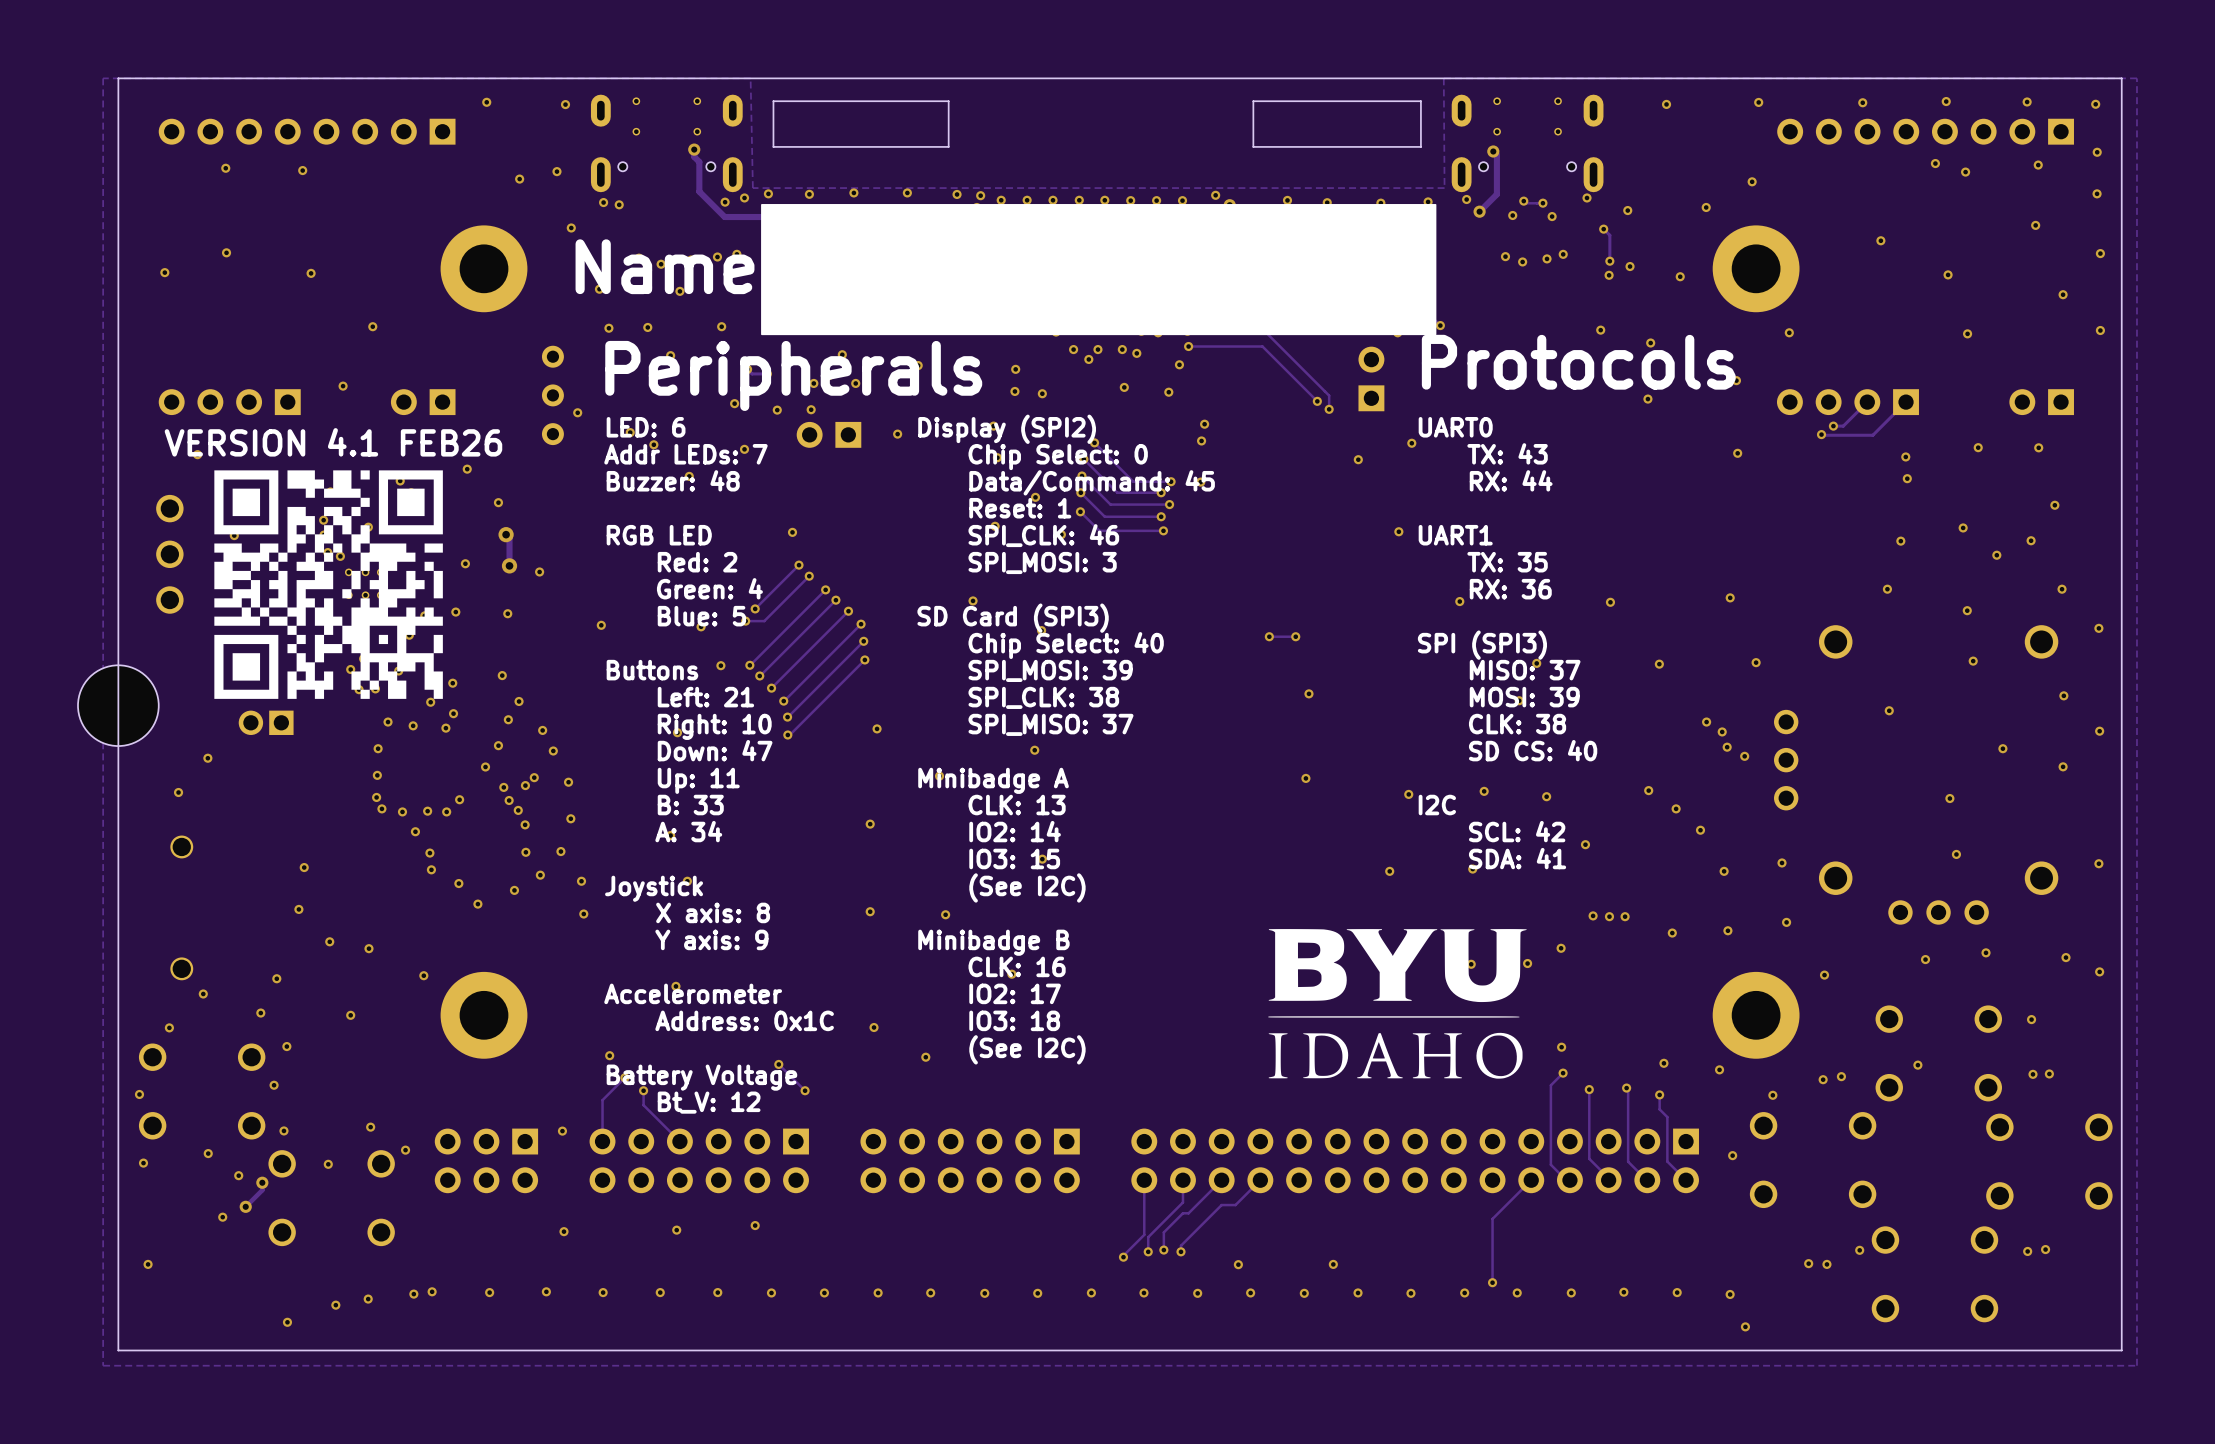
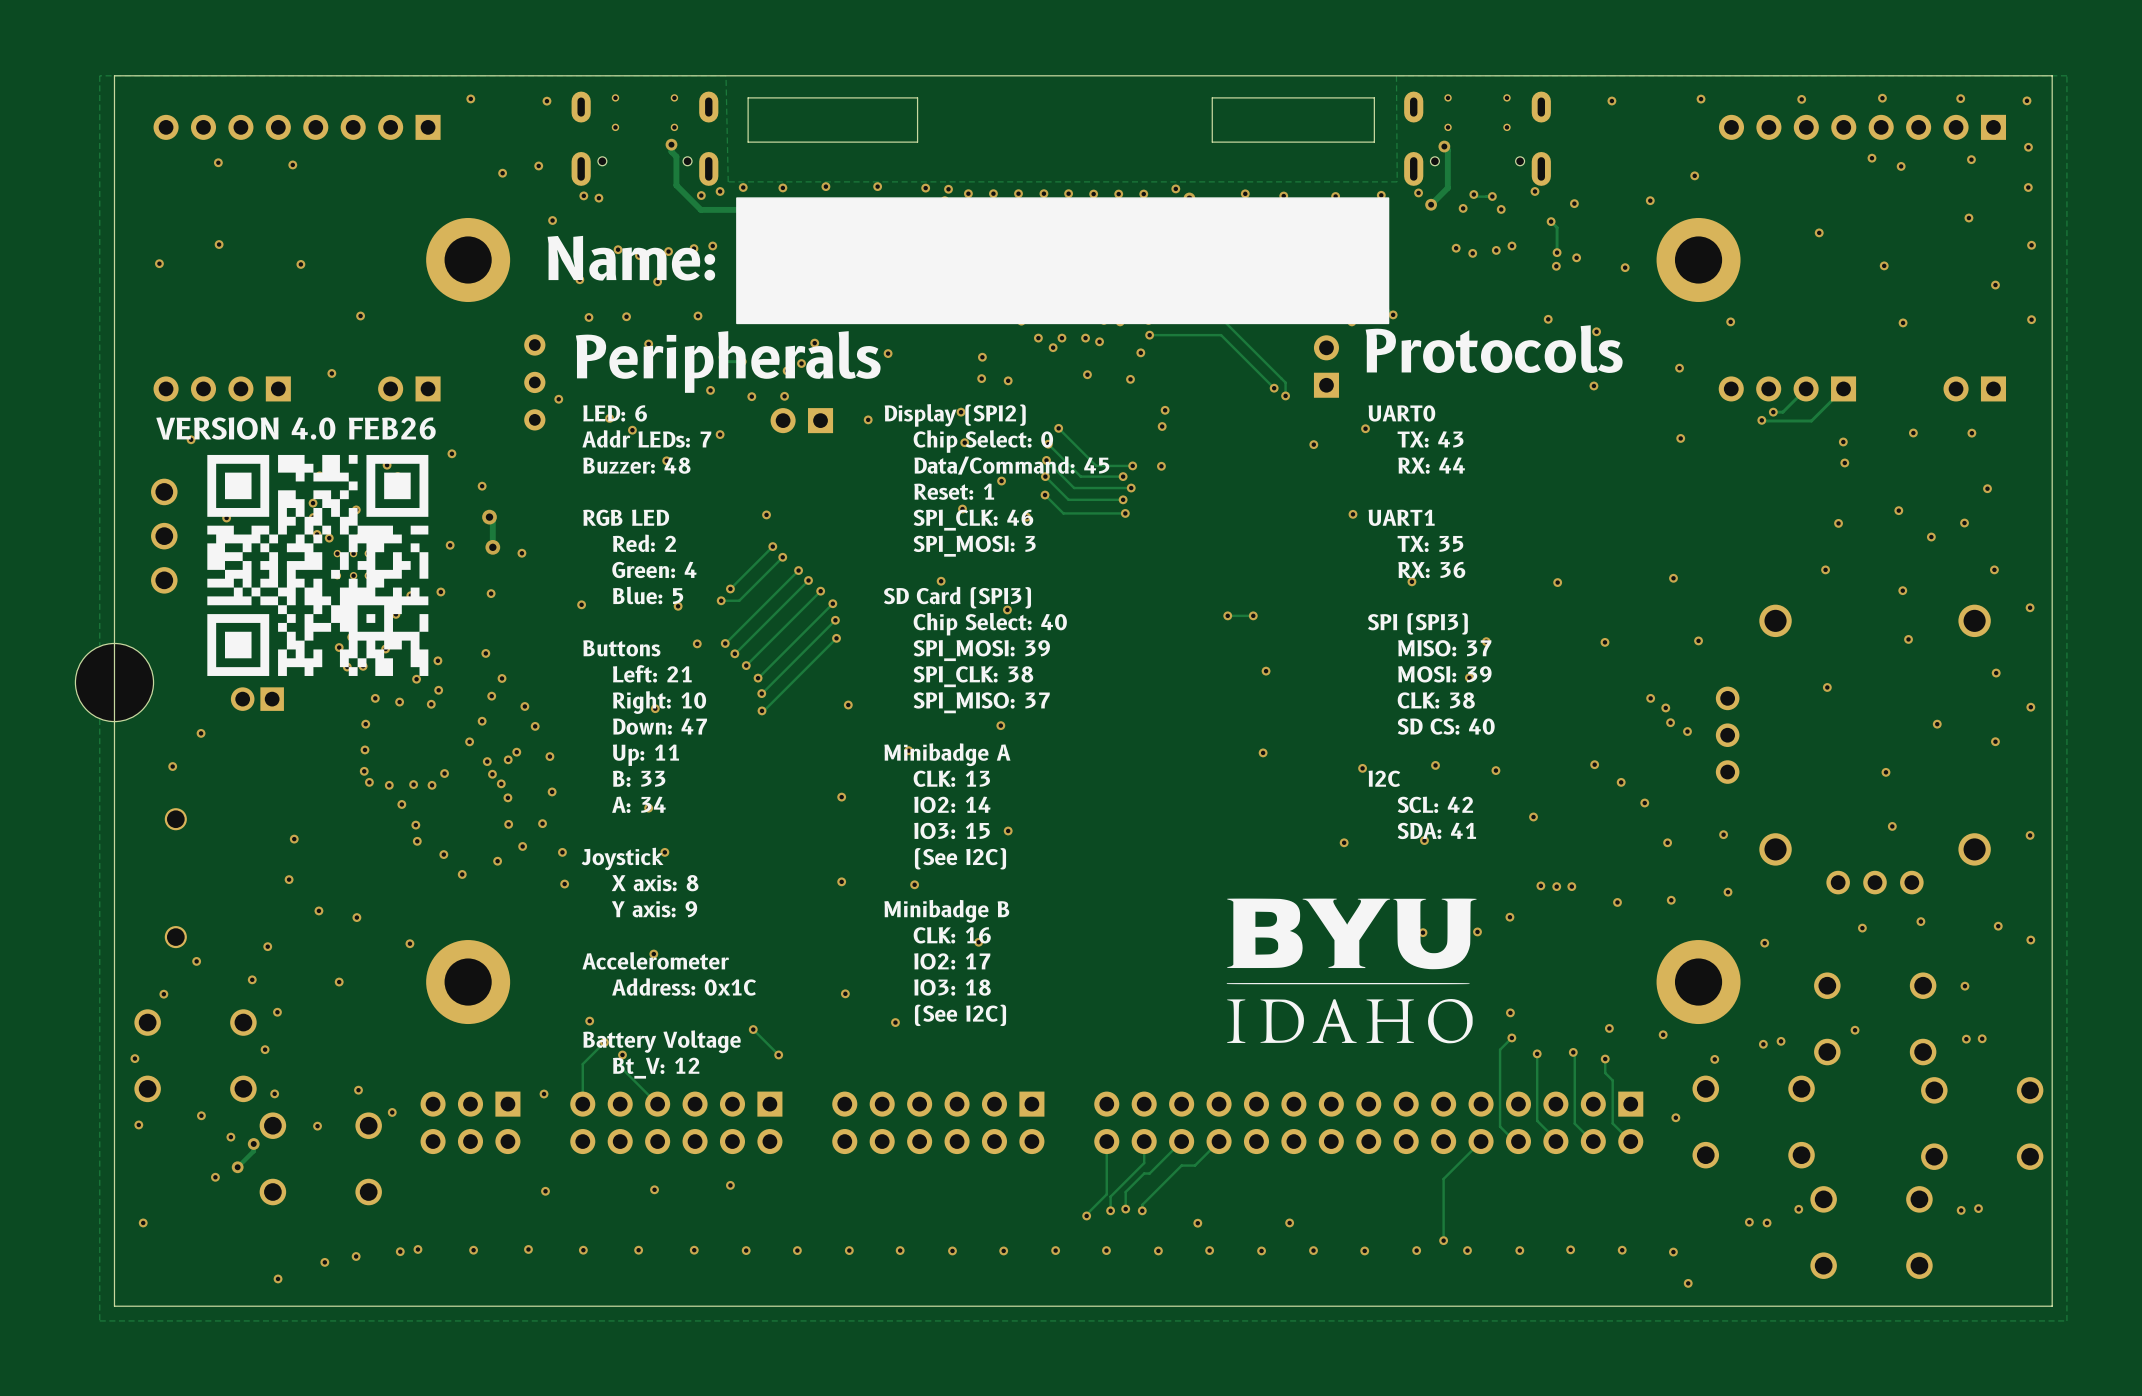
text: VERSION 4.1 FEB26 (333, 442) -> VERSION 4.0 FEB26 (295, 428)

